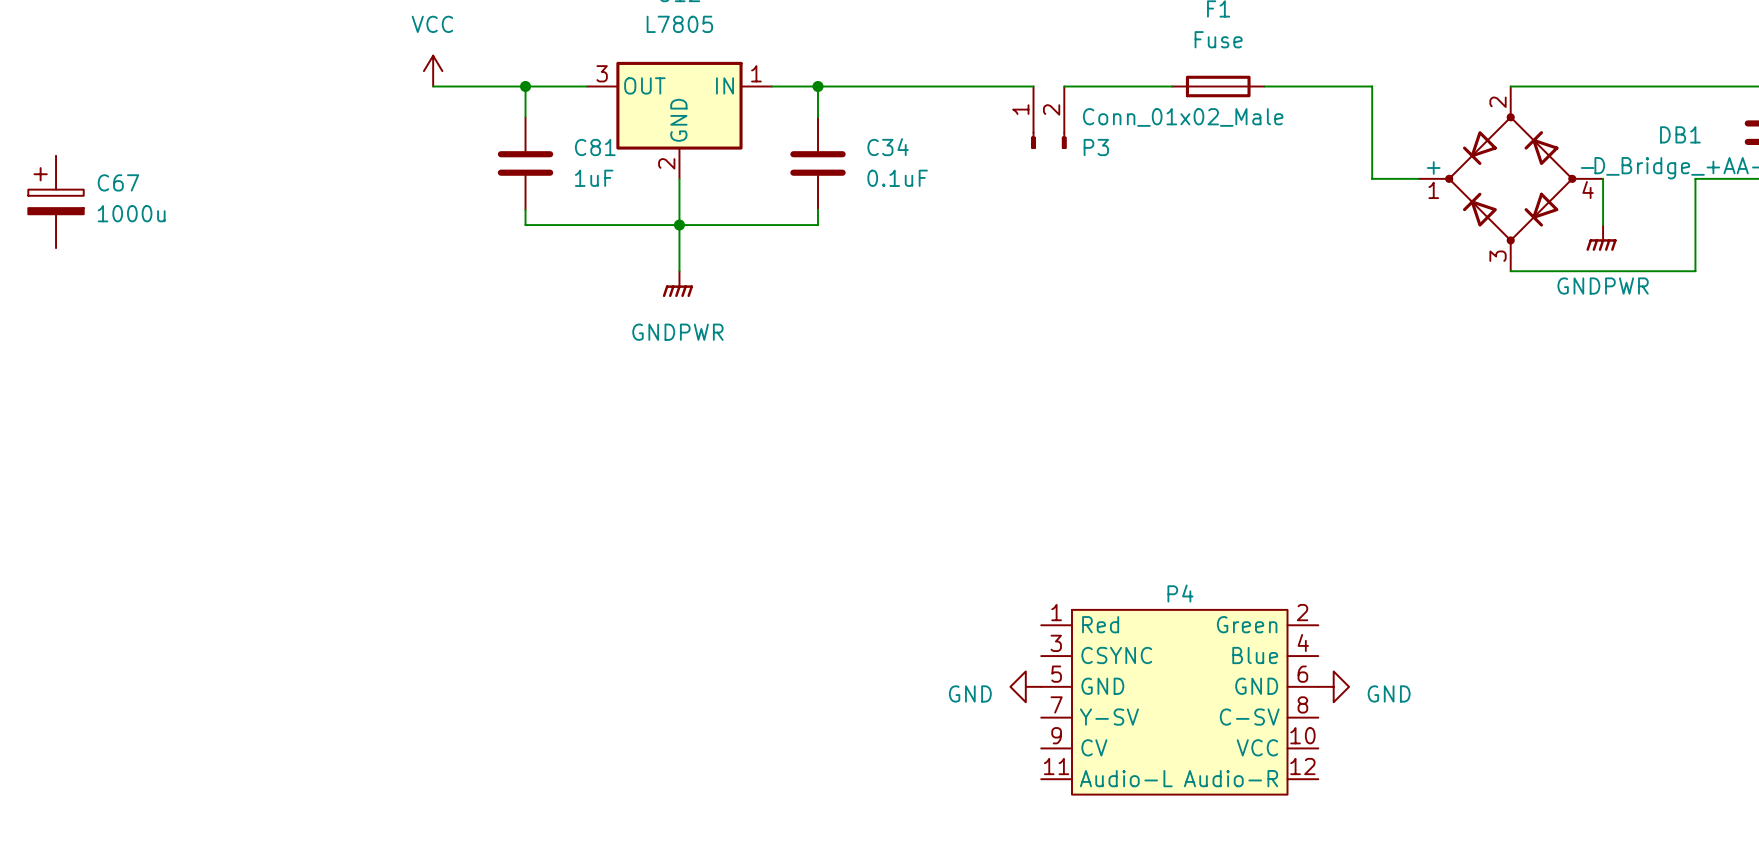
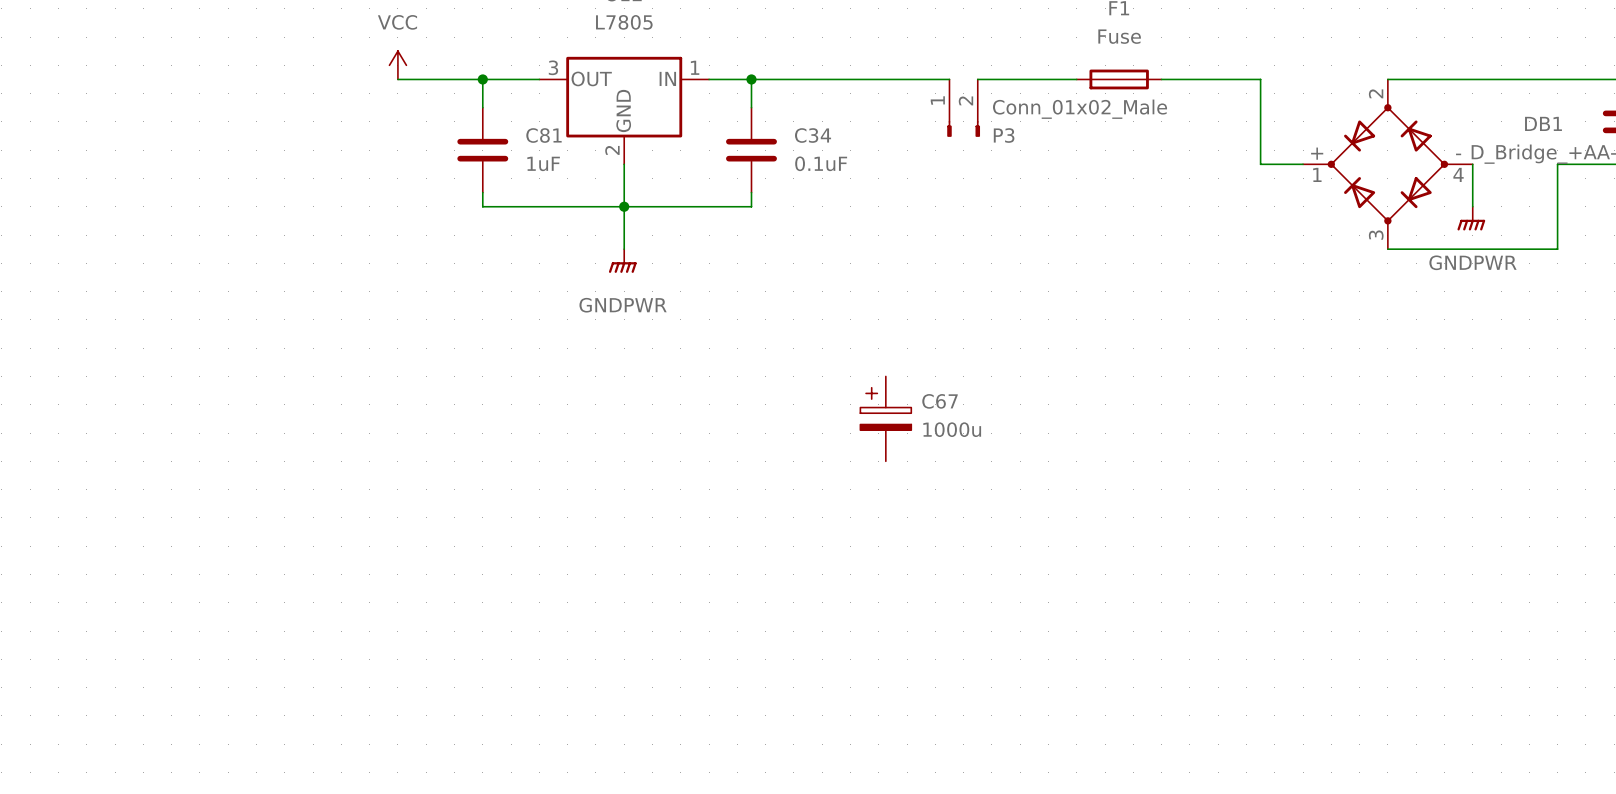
C67 position: (56, 201) -> (885, 418)
power symbol: GND (1025, 686) -> none
power symbol: GND (1333, 686) -> none
P4: (1179, 702) -> none

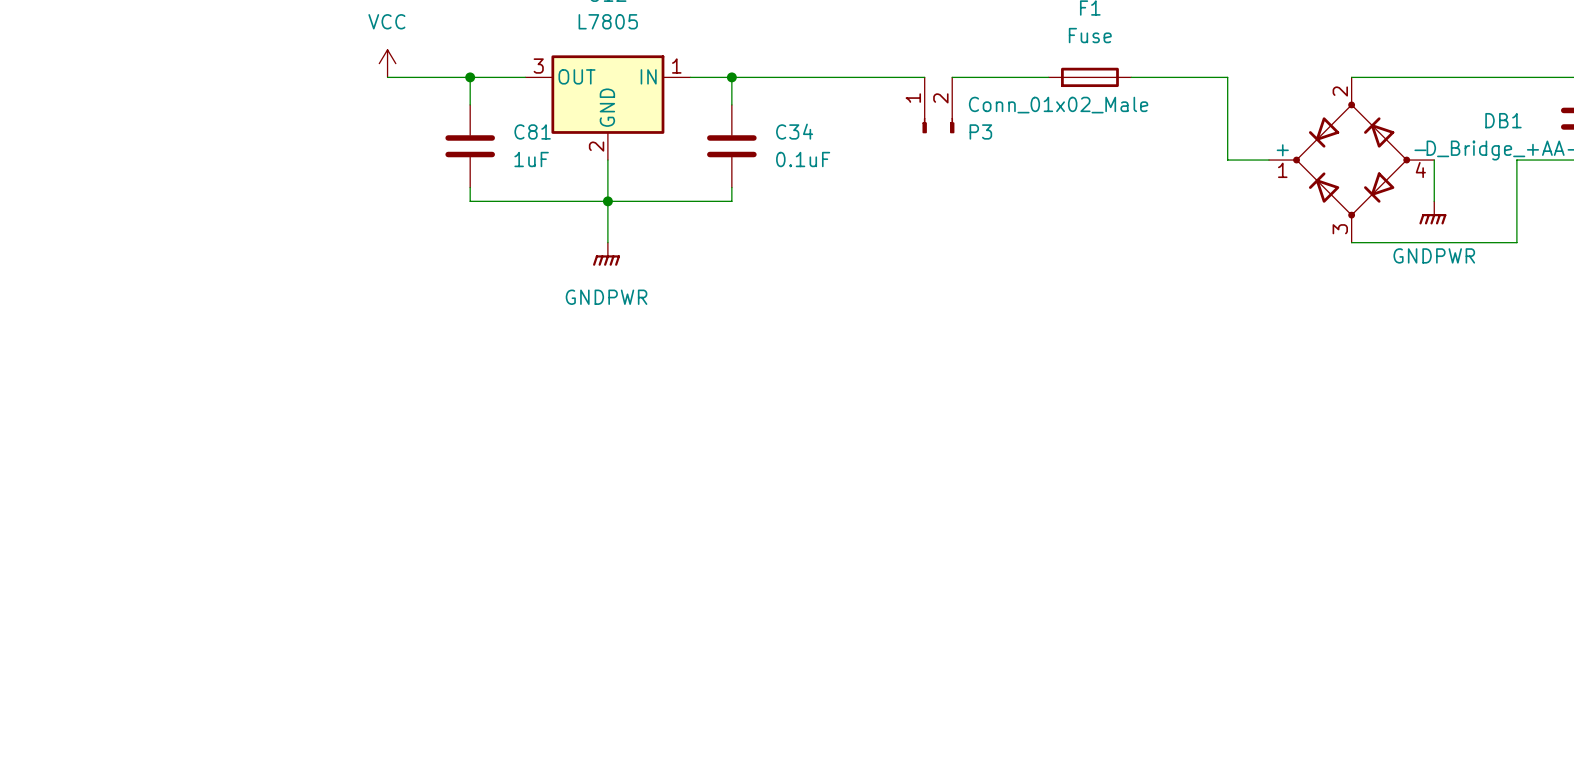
C67: 1000u (885, 418) -> none

